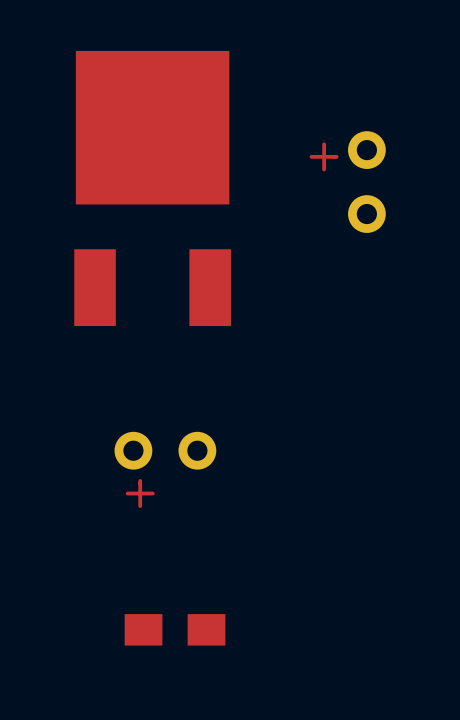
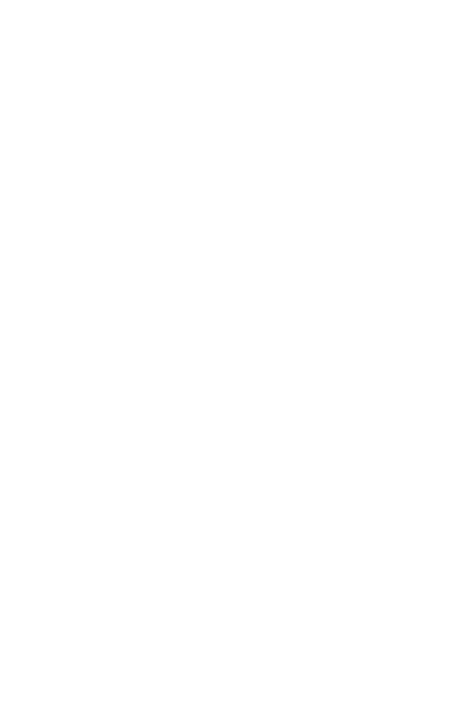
part: (347, 182) -> none
part: (152, 188) -> none
part: (165, 469) -> none
part: (175, 629) -> none

